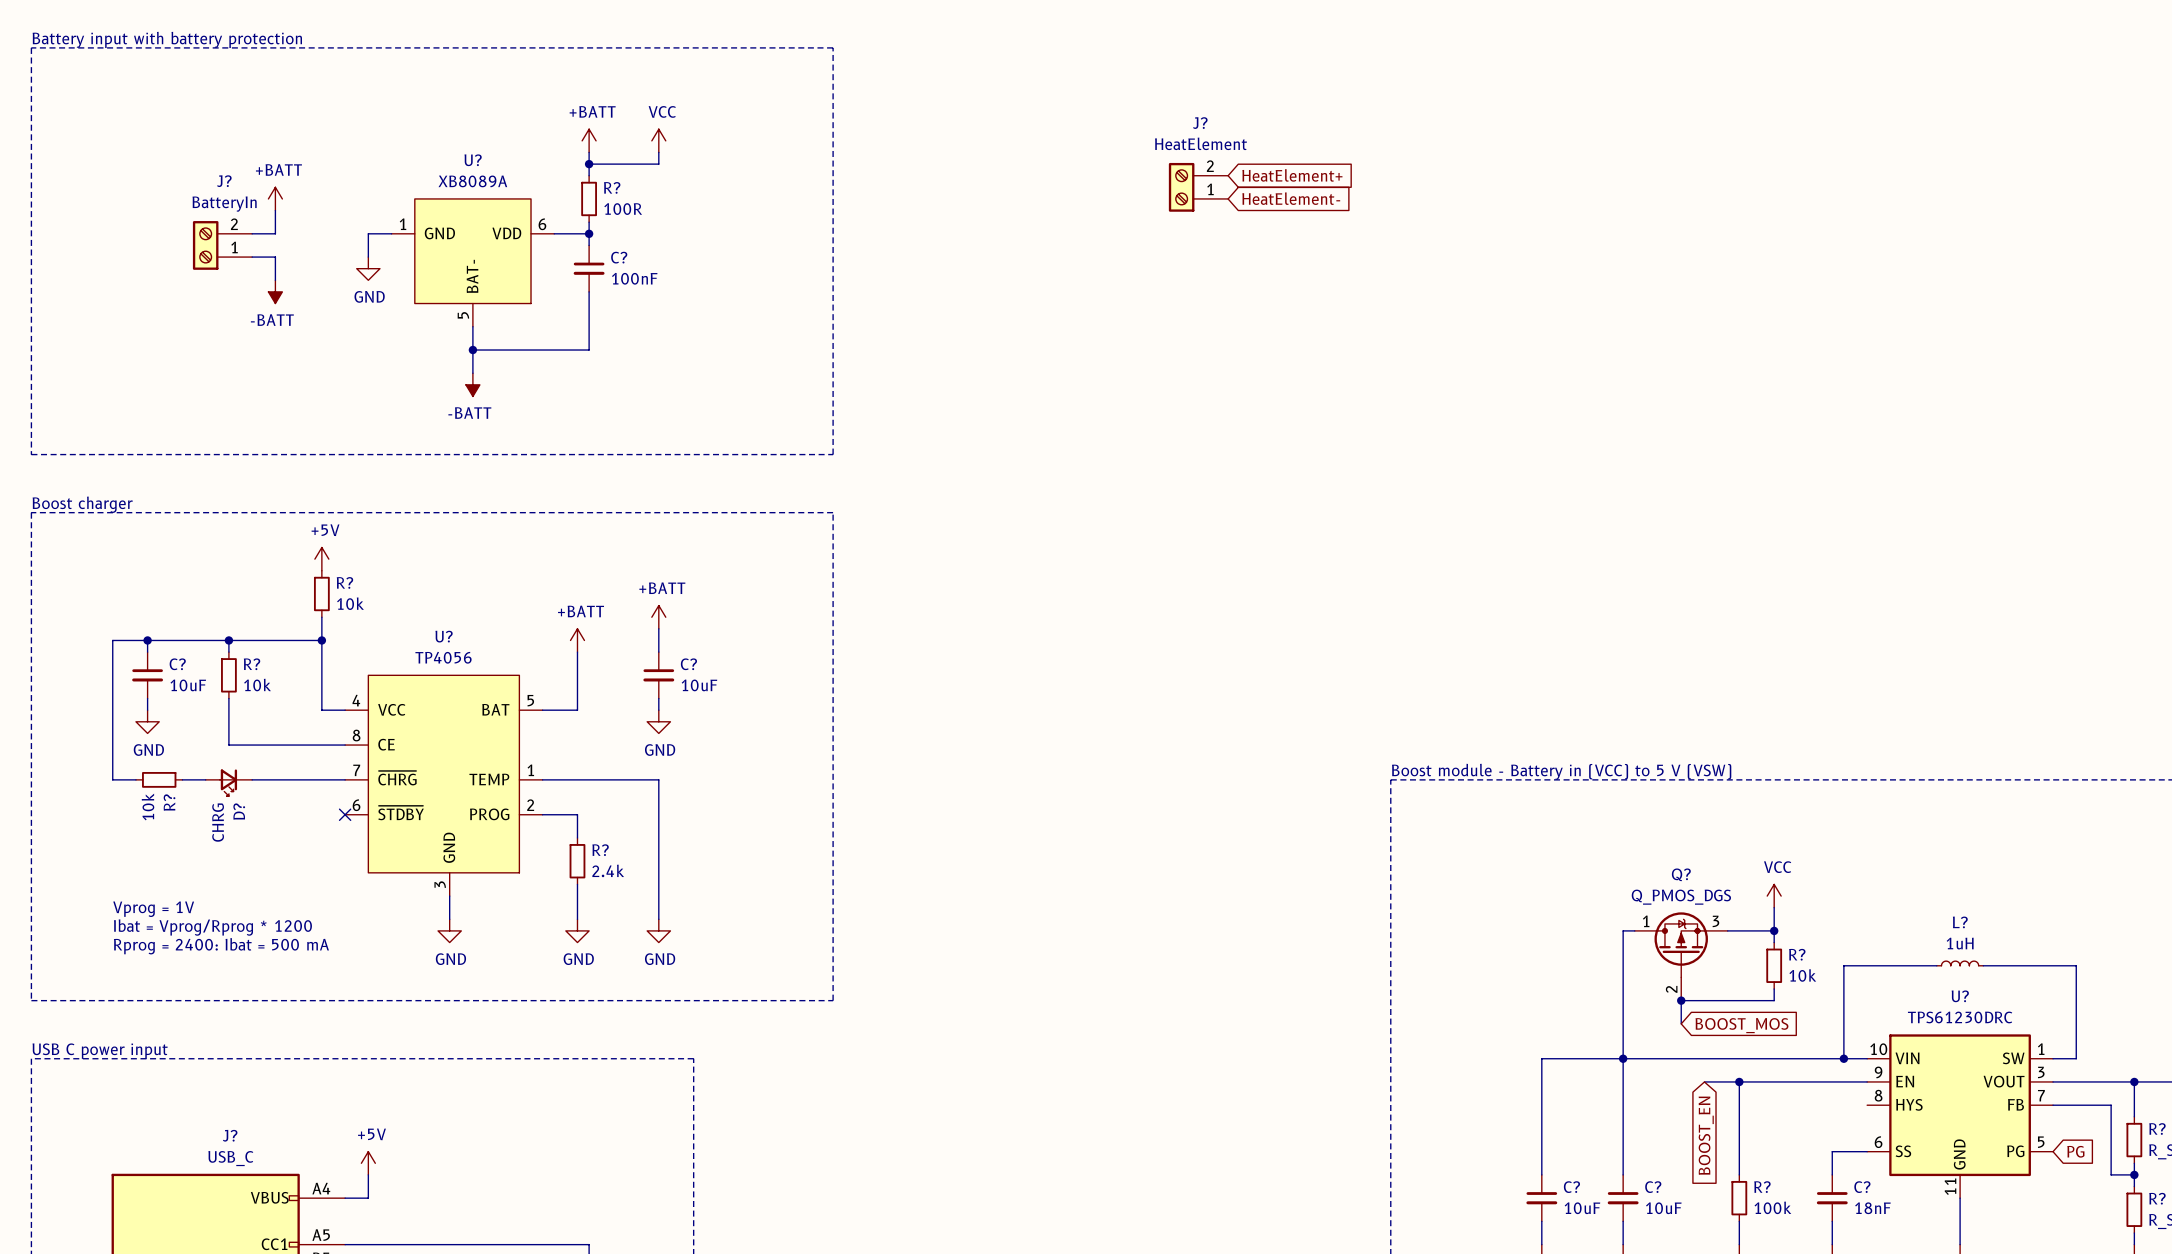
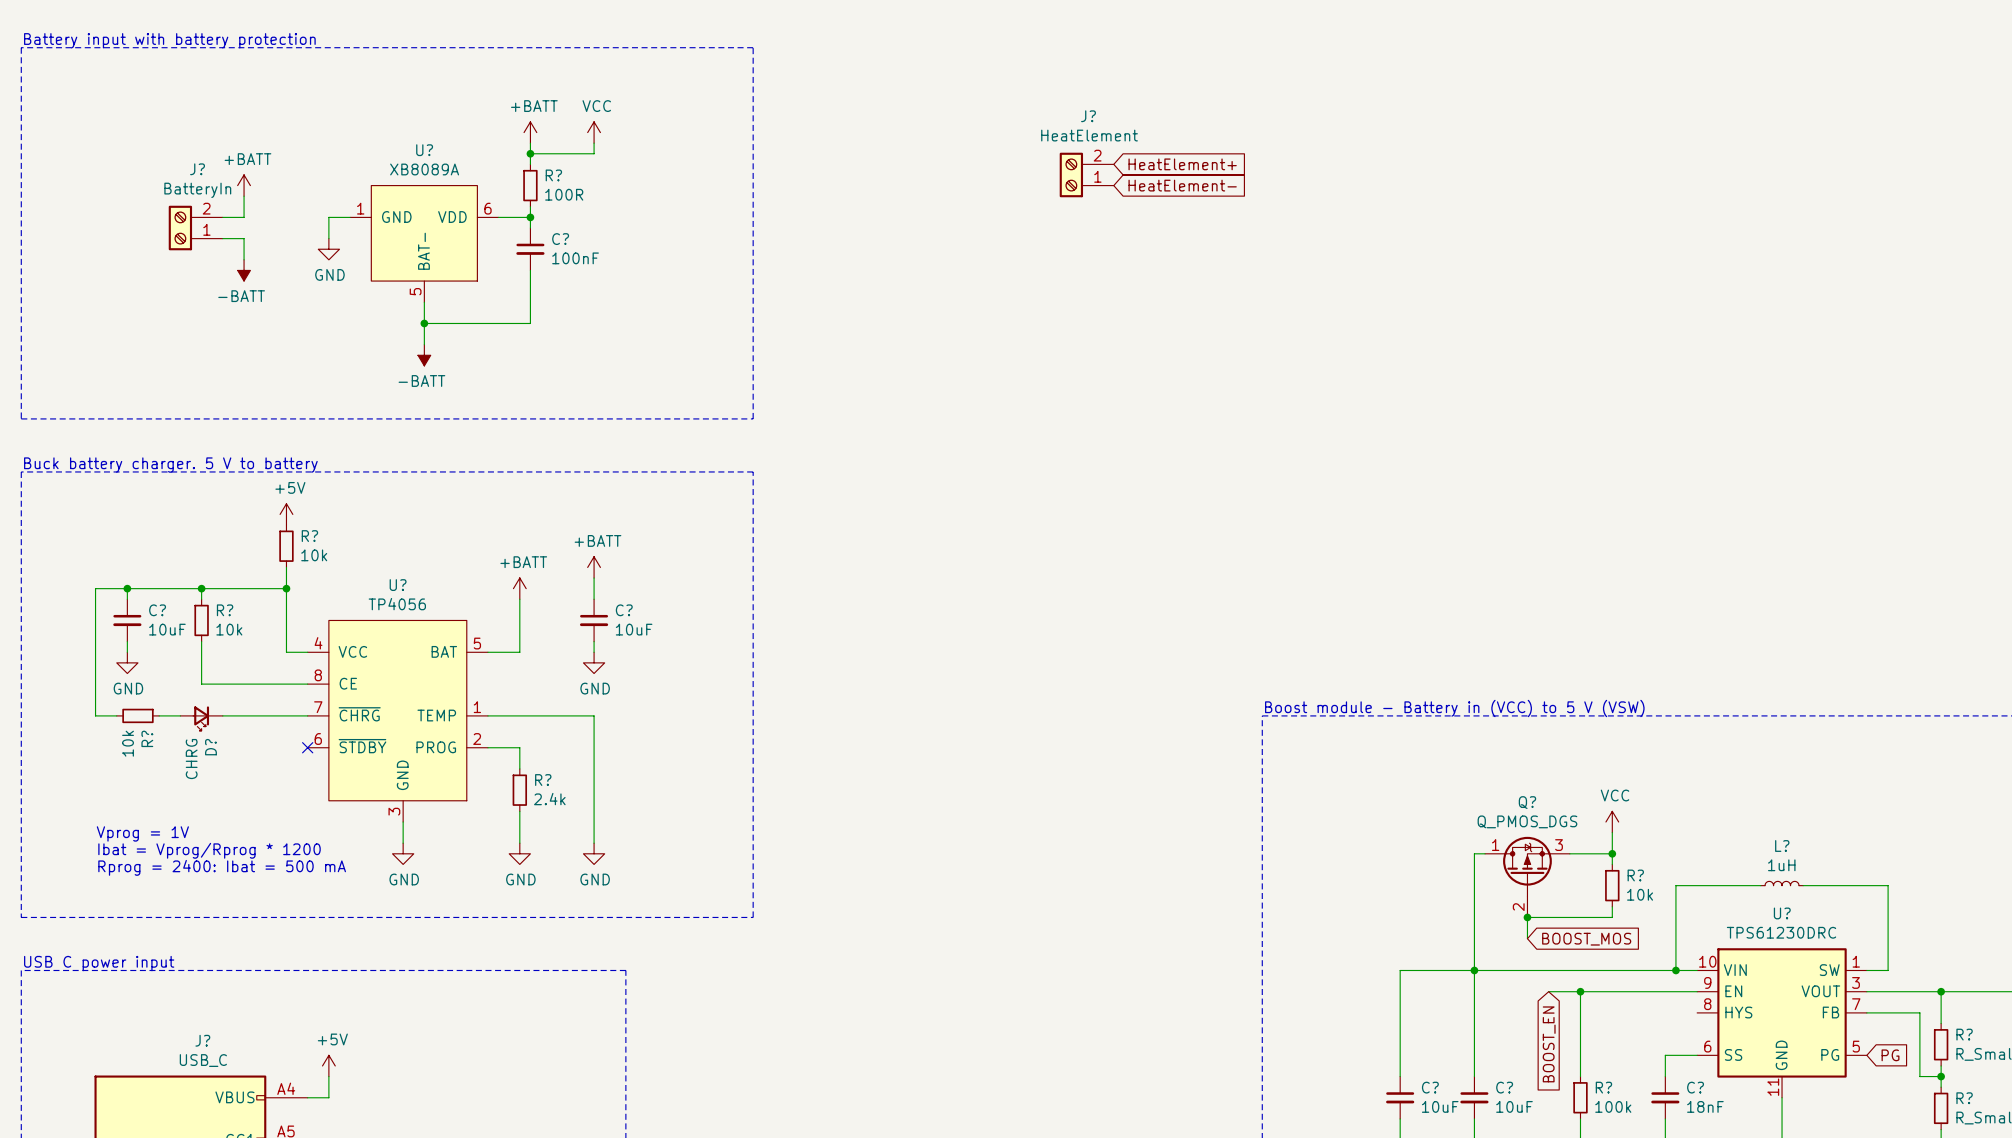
text: Boost charger (82, 504) -> Buck battery charger. 5 V to battery (170, 465)

